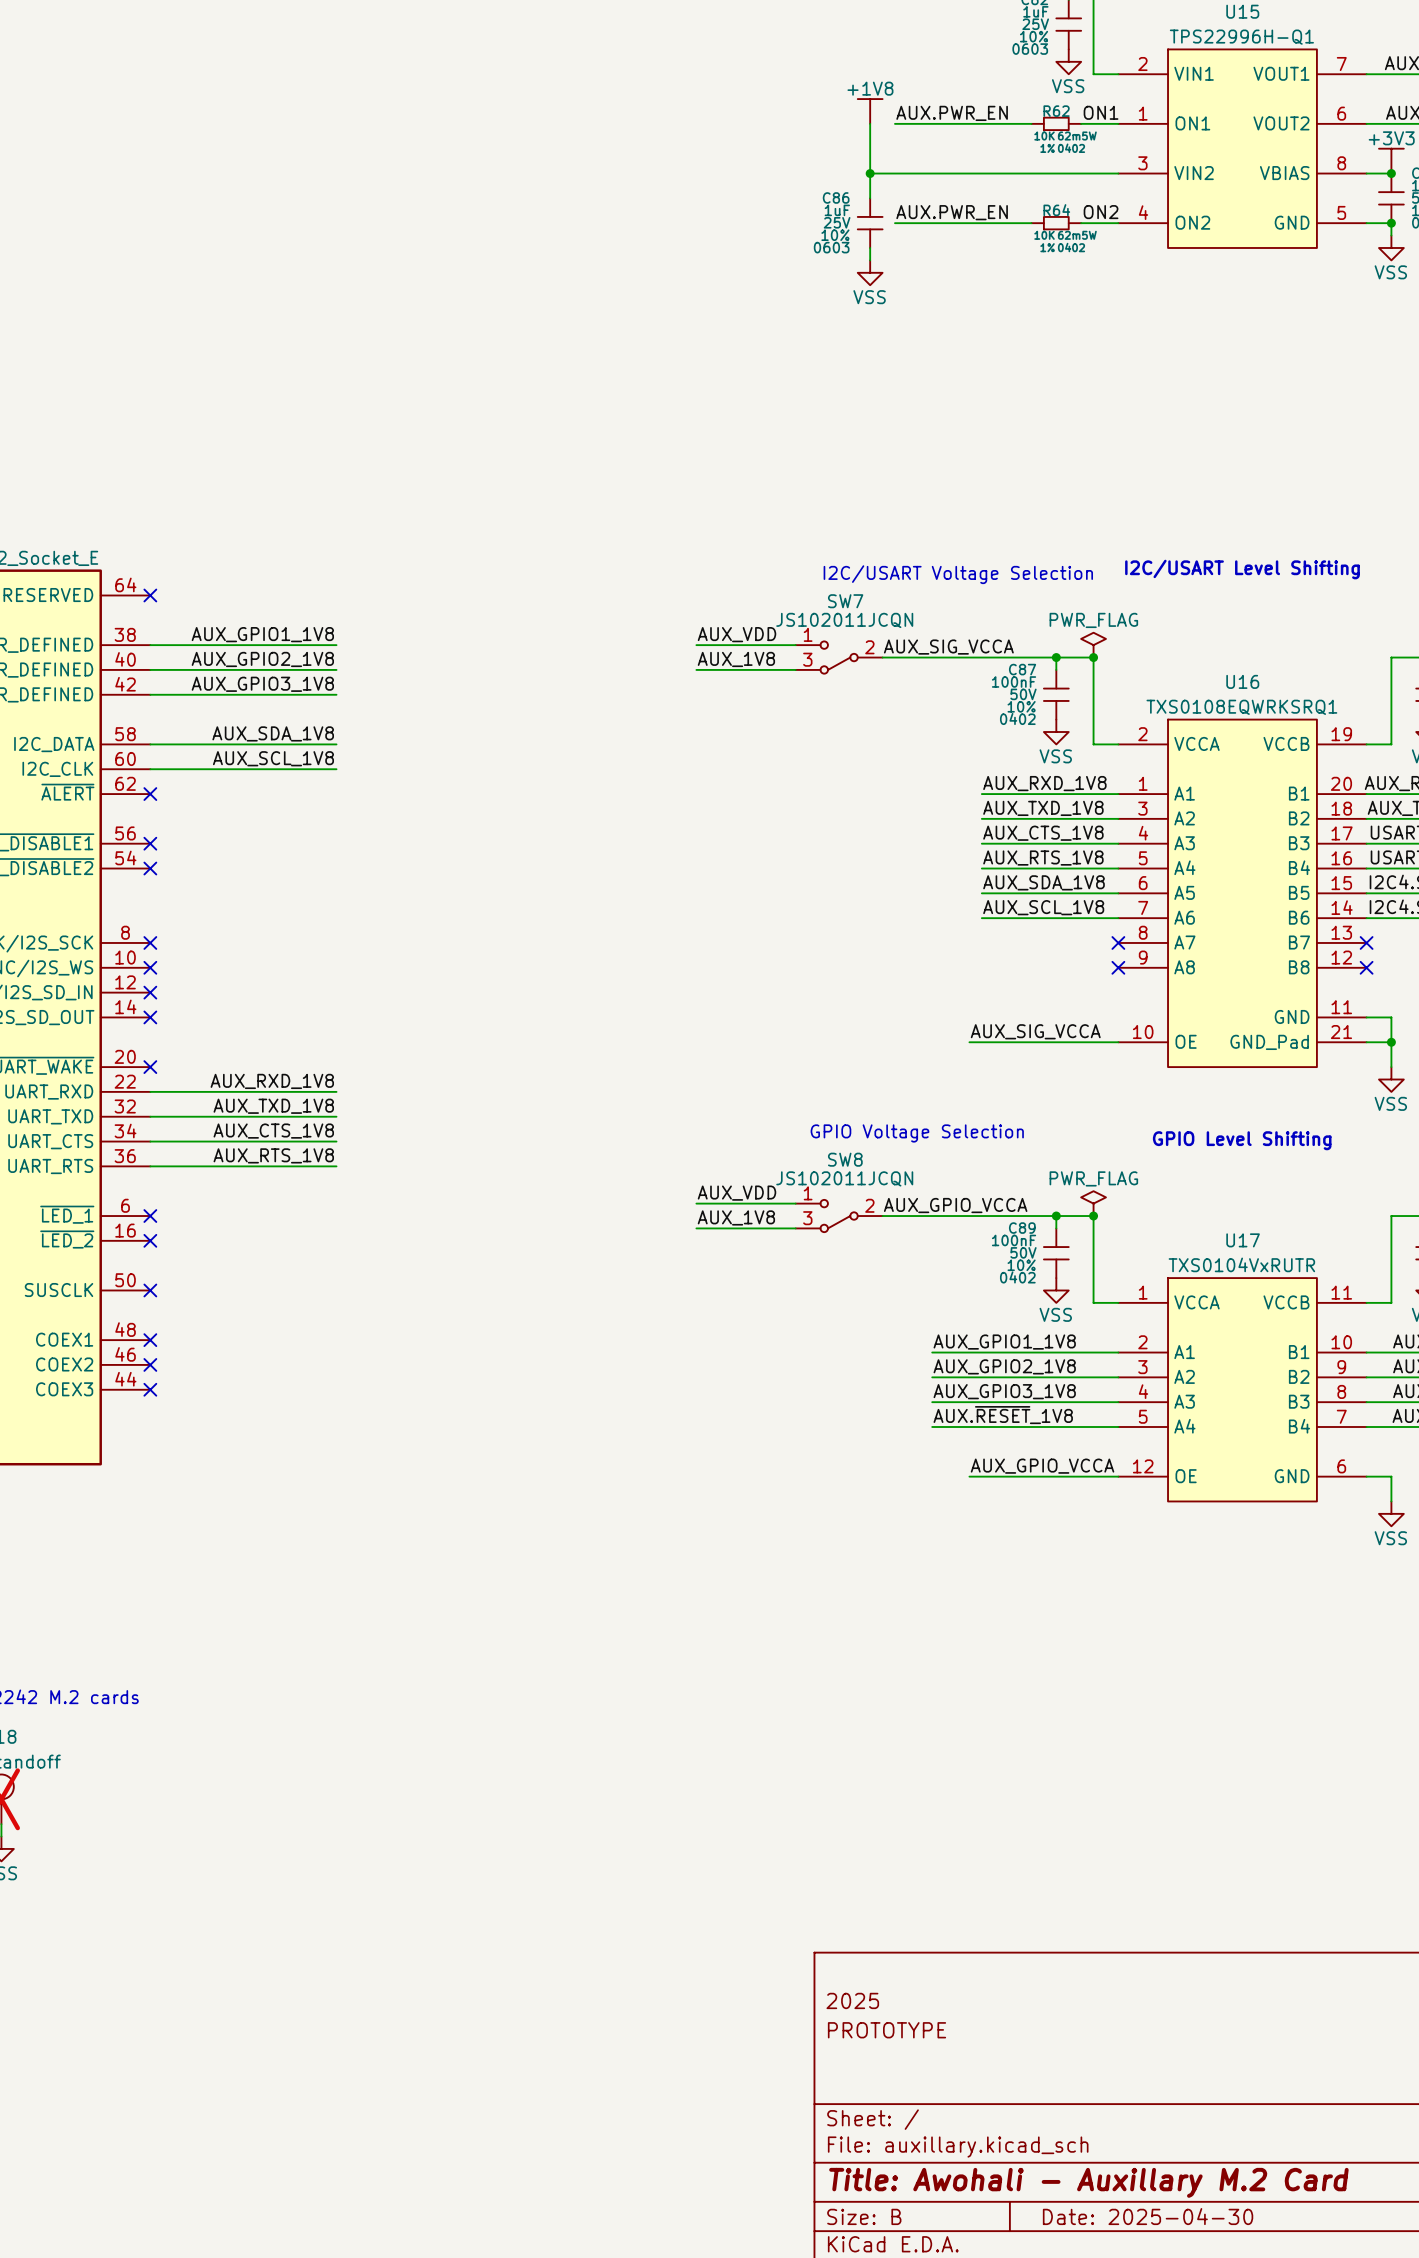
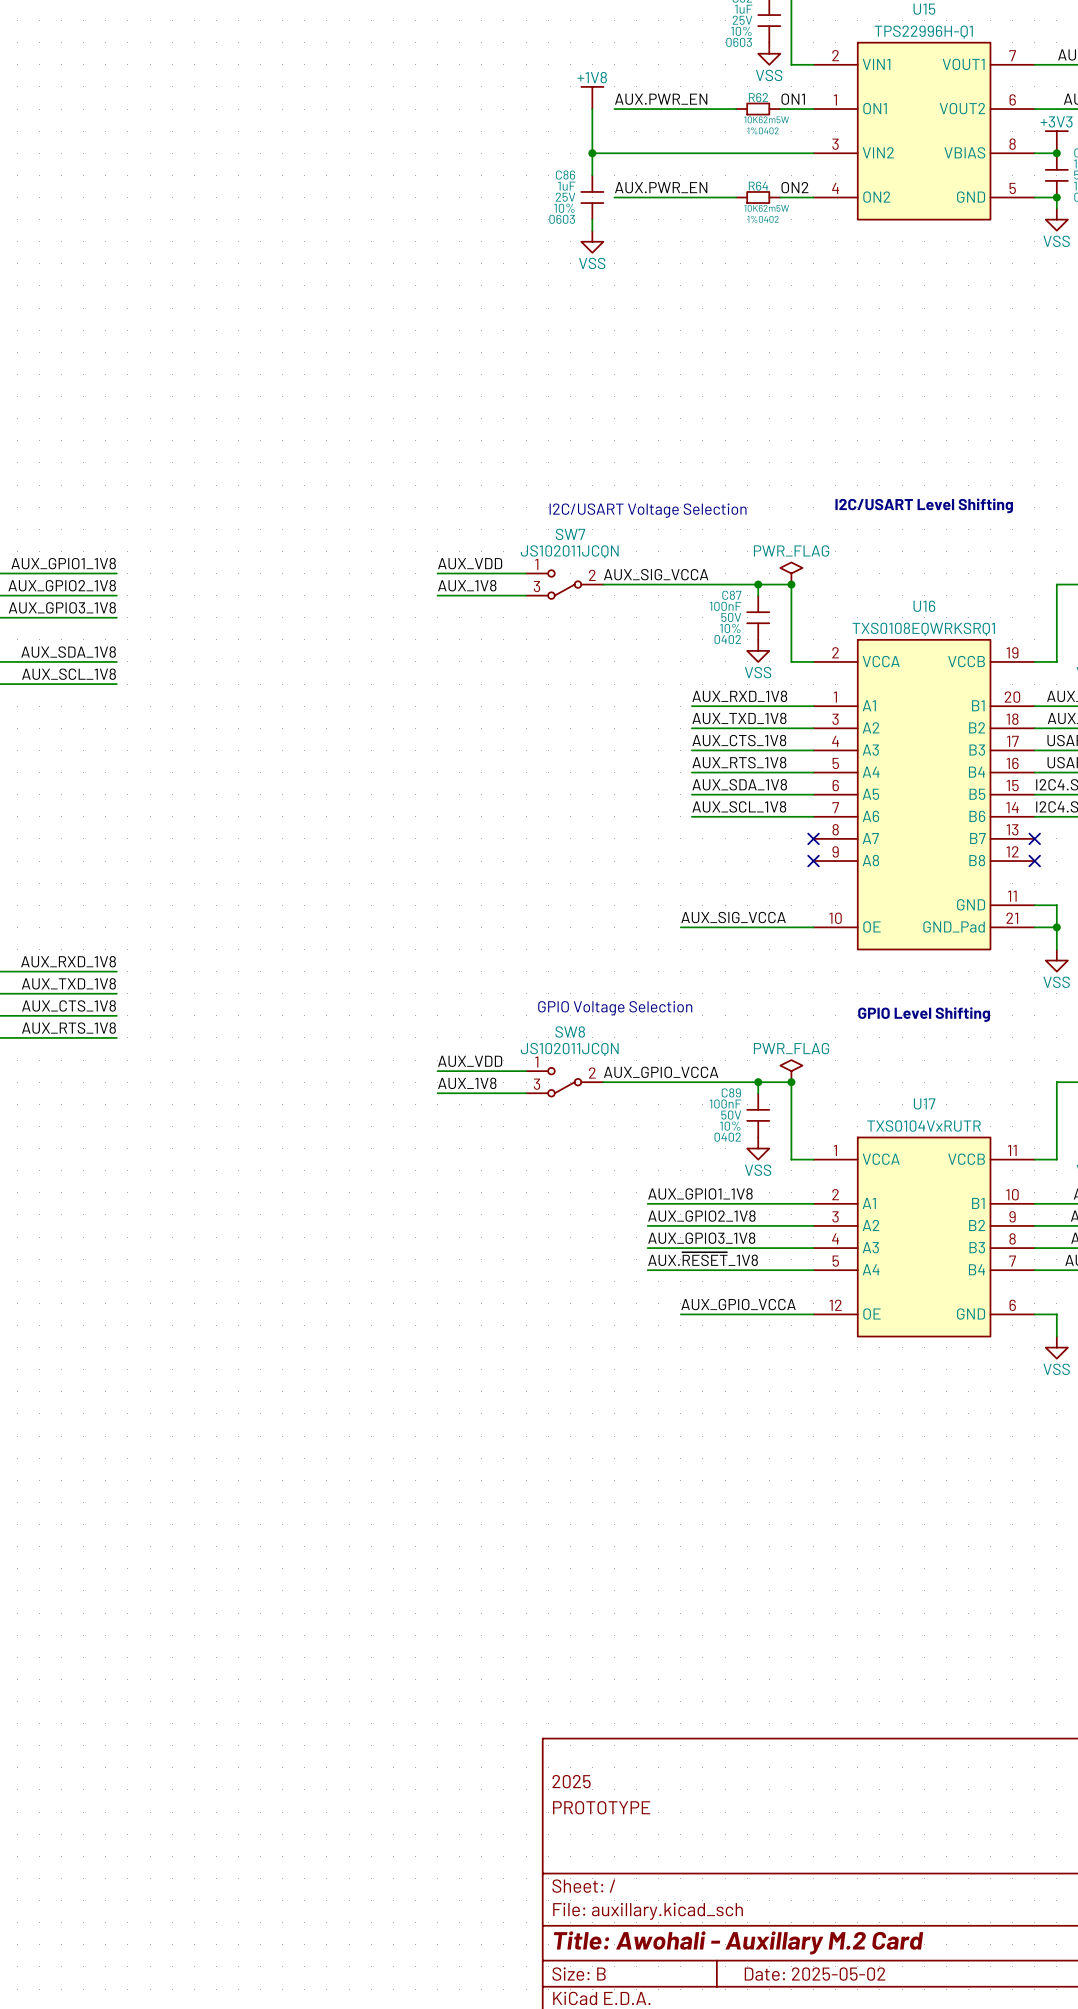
title block: Date: 2025-04-30 (1148, 2216) -> Date: 2025-05-02 (815, 1974)

